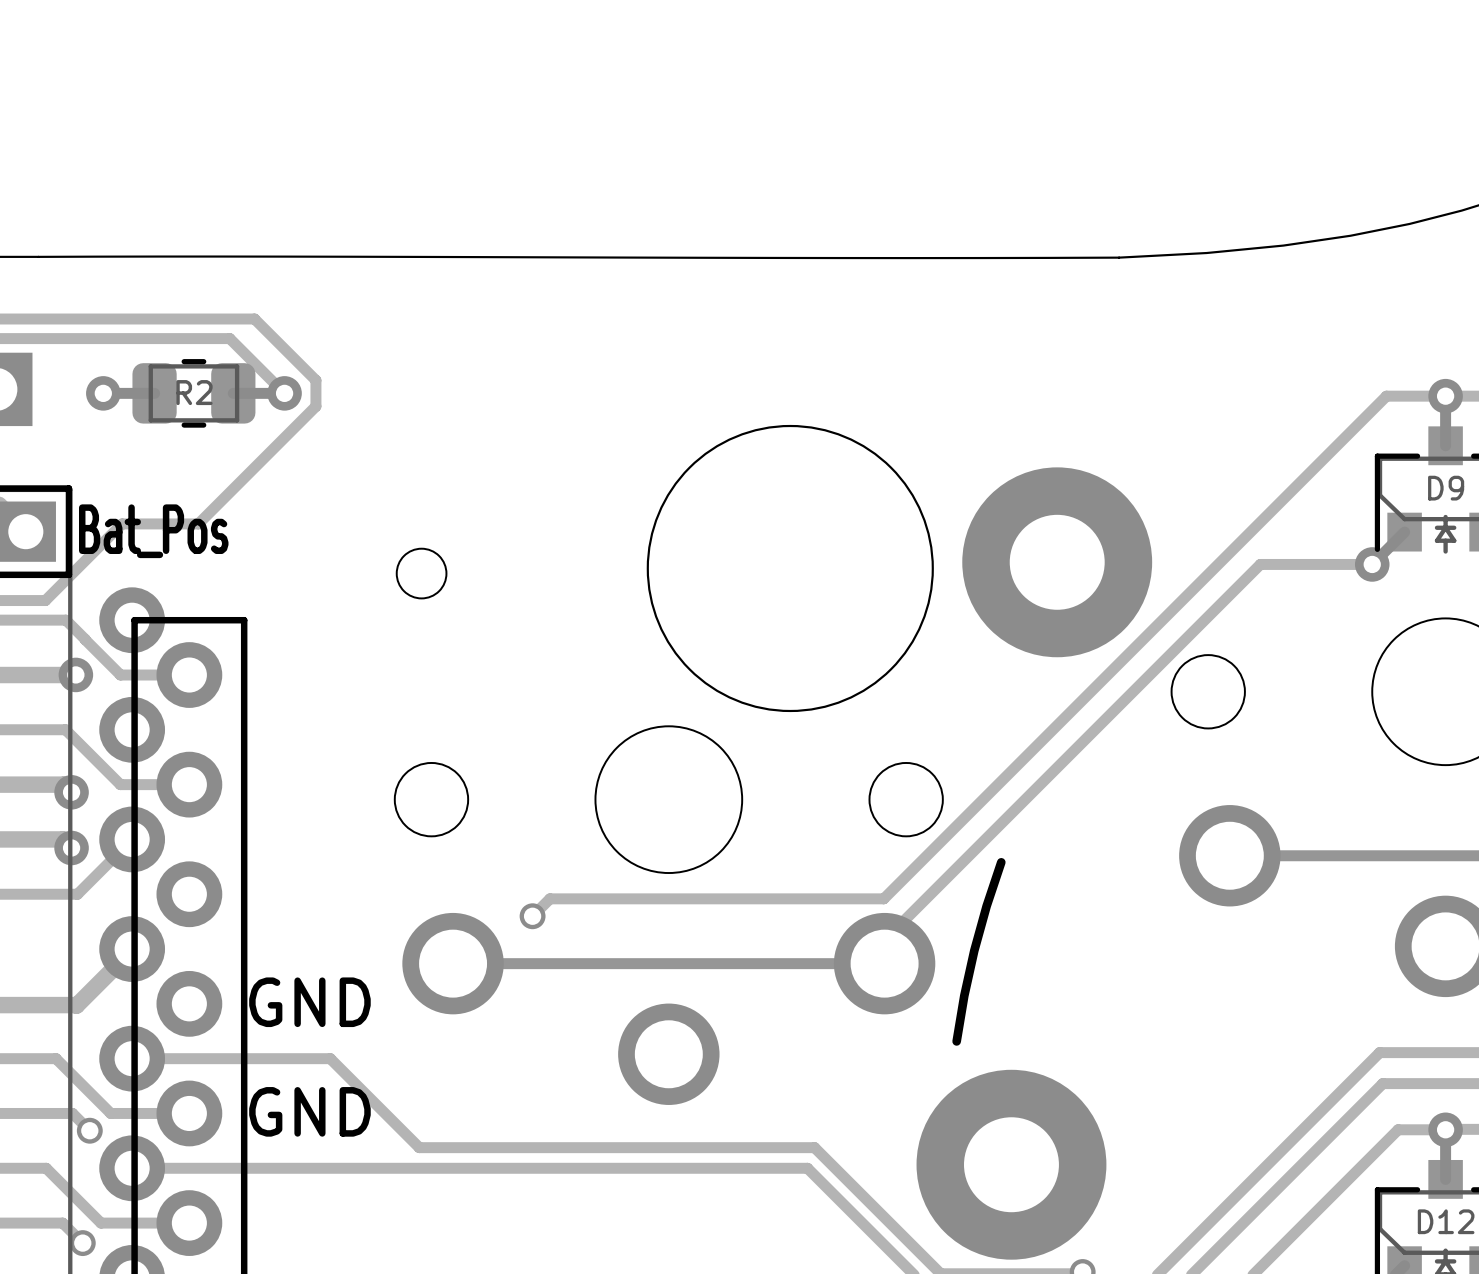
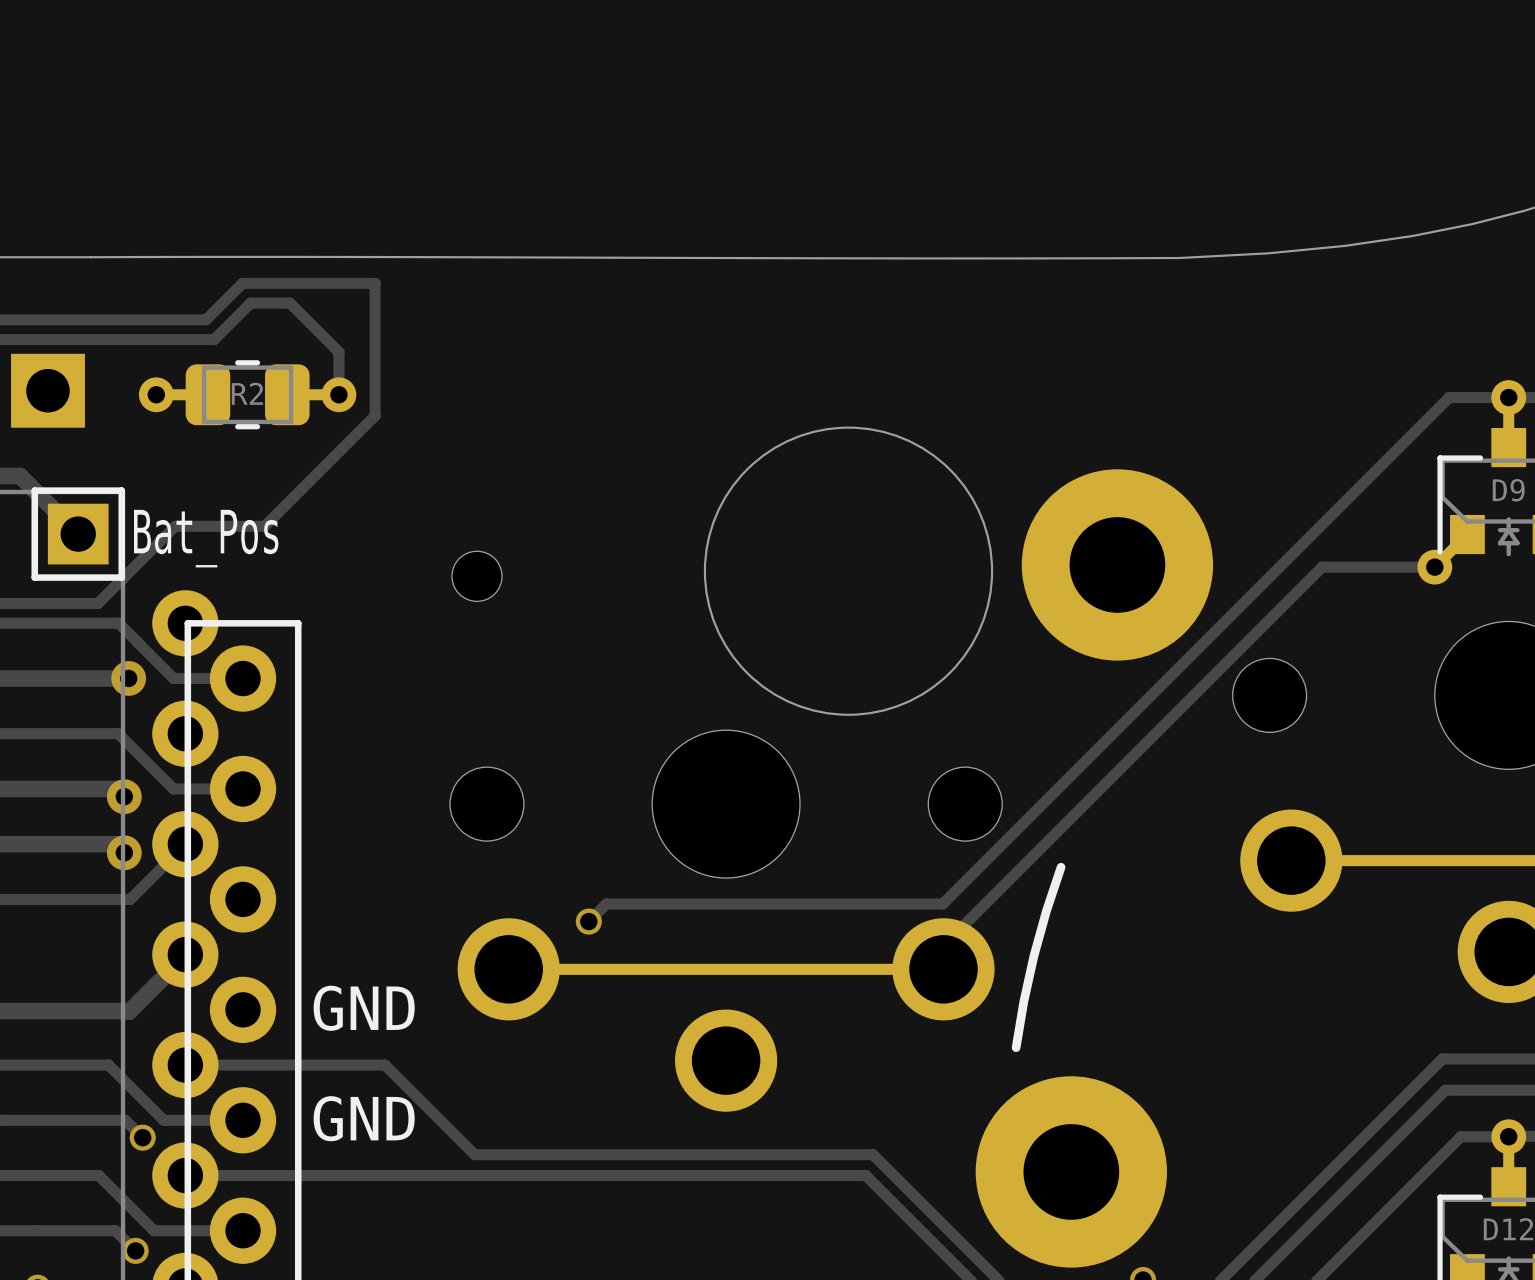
track: (152, 319) (254, 319) (315, 380) (315, 406) (198, 523) -> (206, 319) (242, 283) (375, 283) (375, 415) (264, 526) (252, 526)
track: (160, 338) (229, 338) (284, 393) -> (214, 339) (250, 303) (289, 303) (338, 352) (338, 394)

